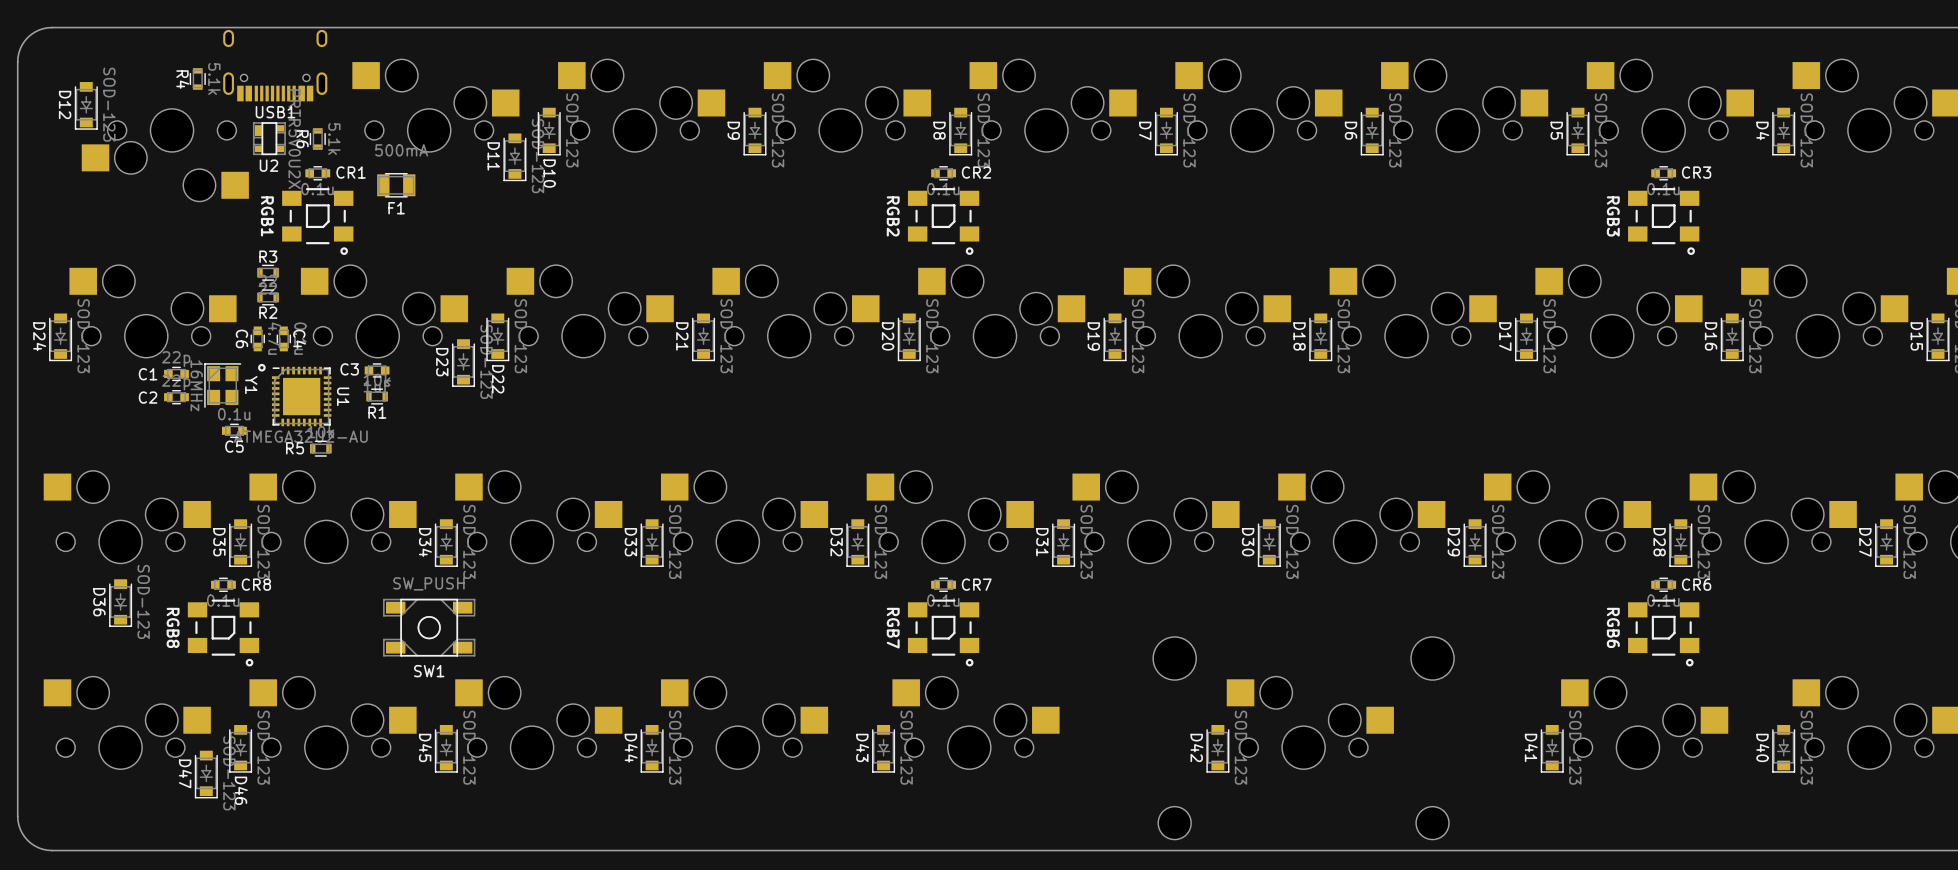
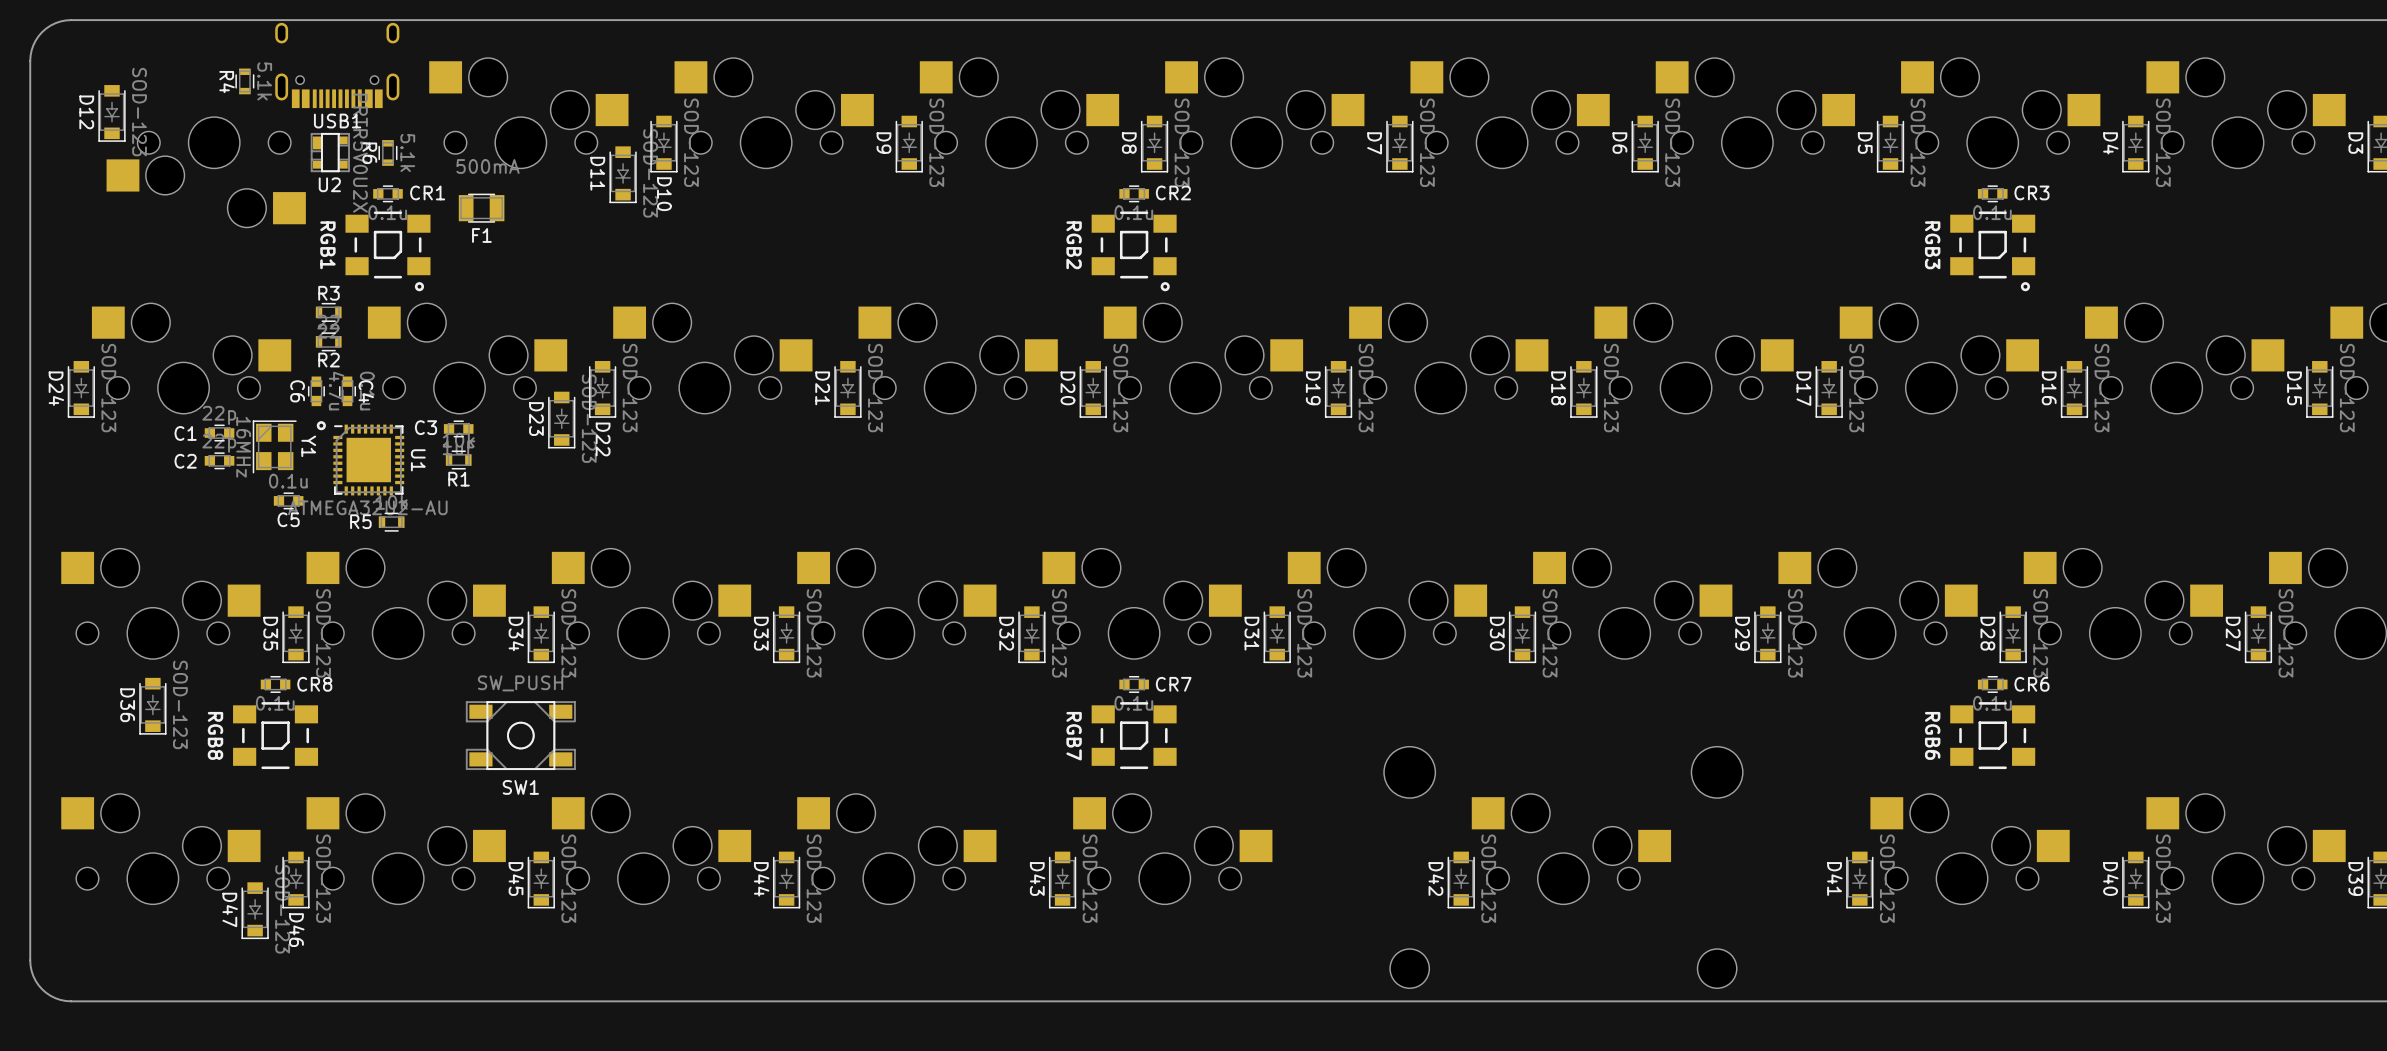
drawing: [245, 658, 254, 667] -> none
drawing: [965, 658, 974, 667] -> none
drawing: [1685, 658, 1694, 667] -> none

